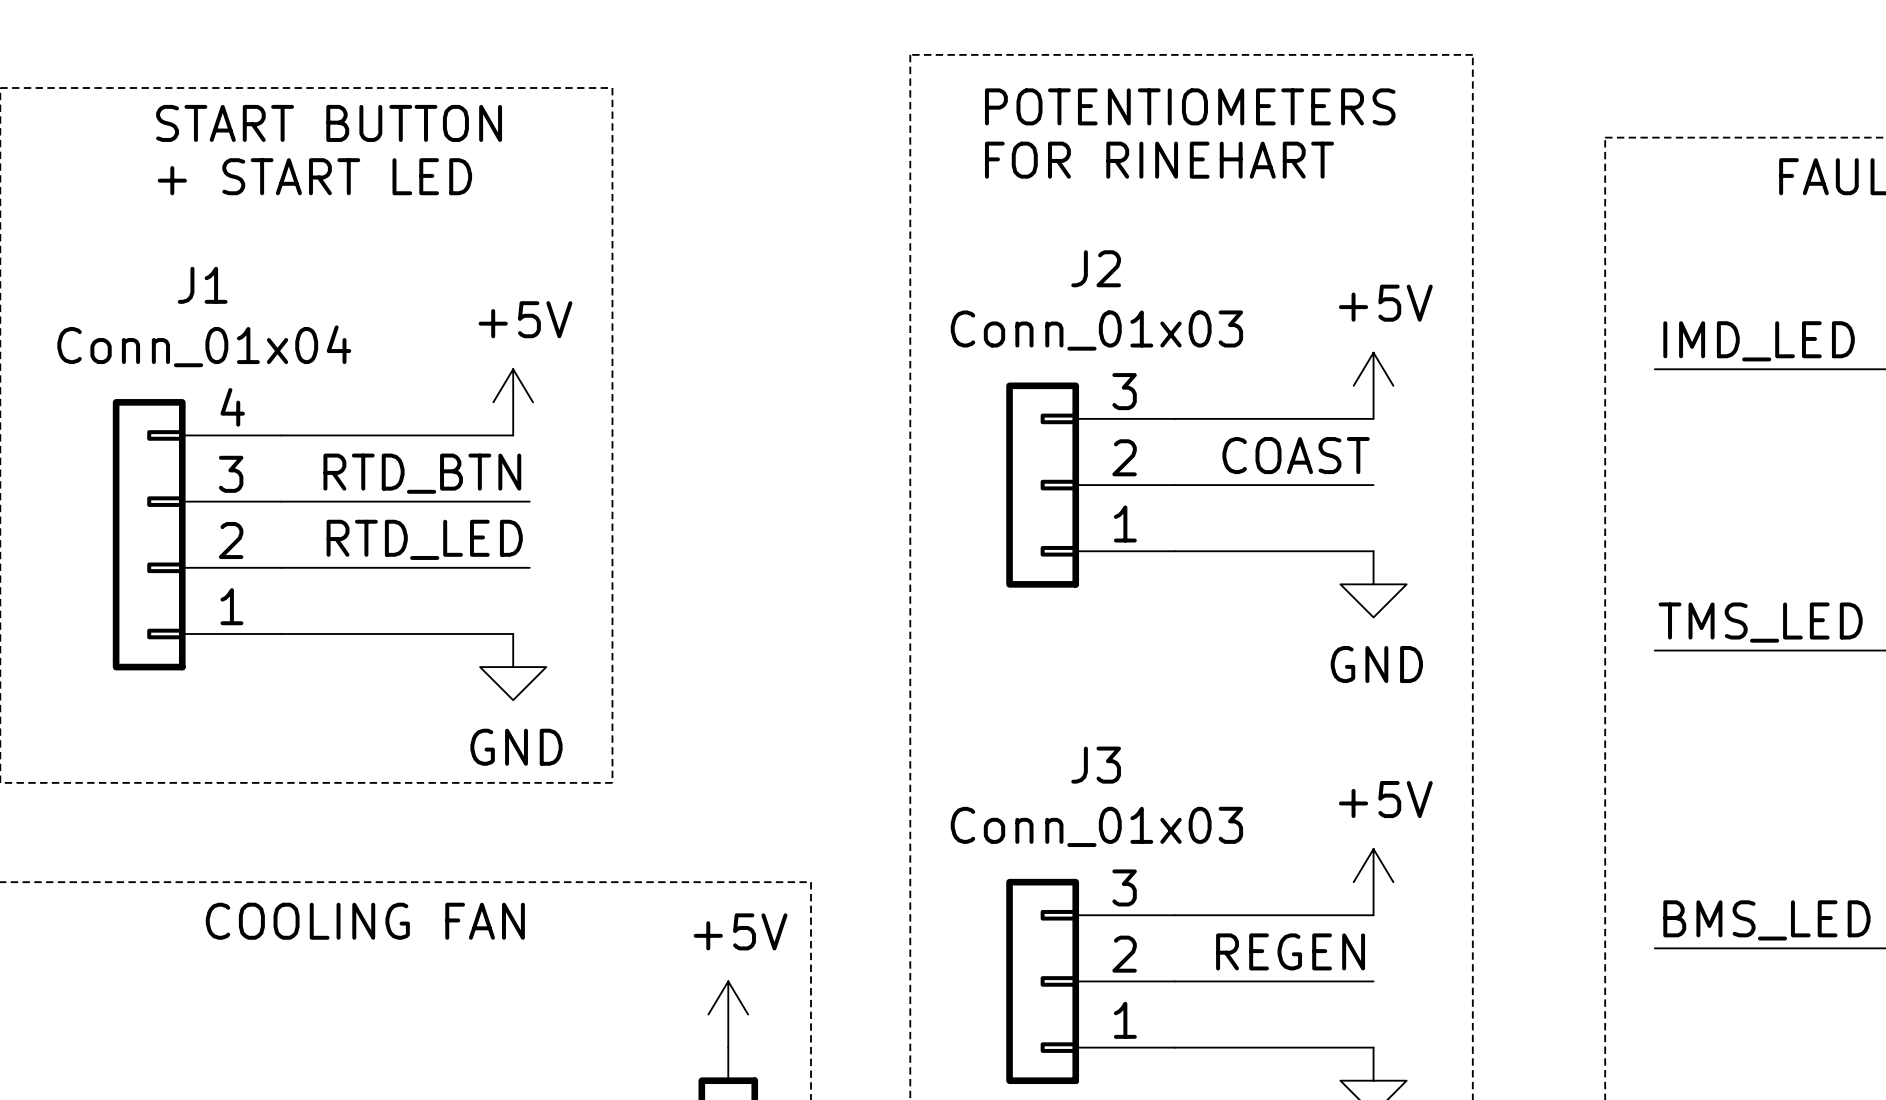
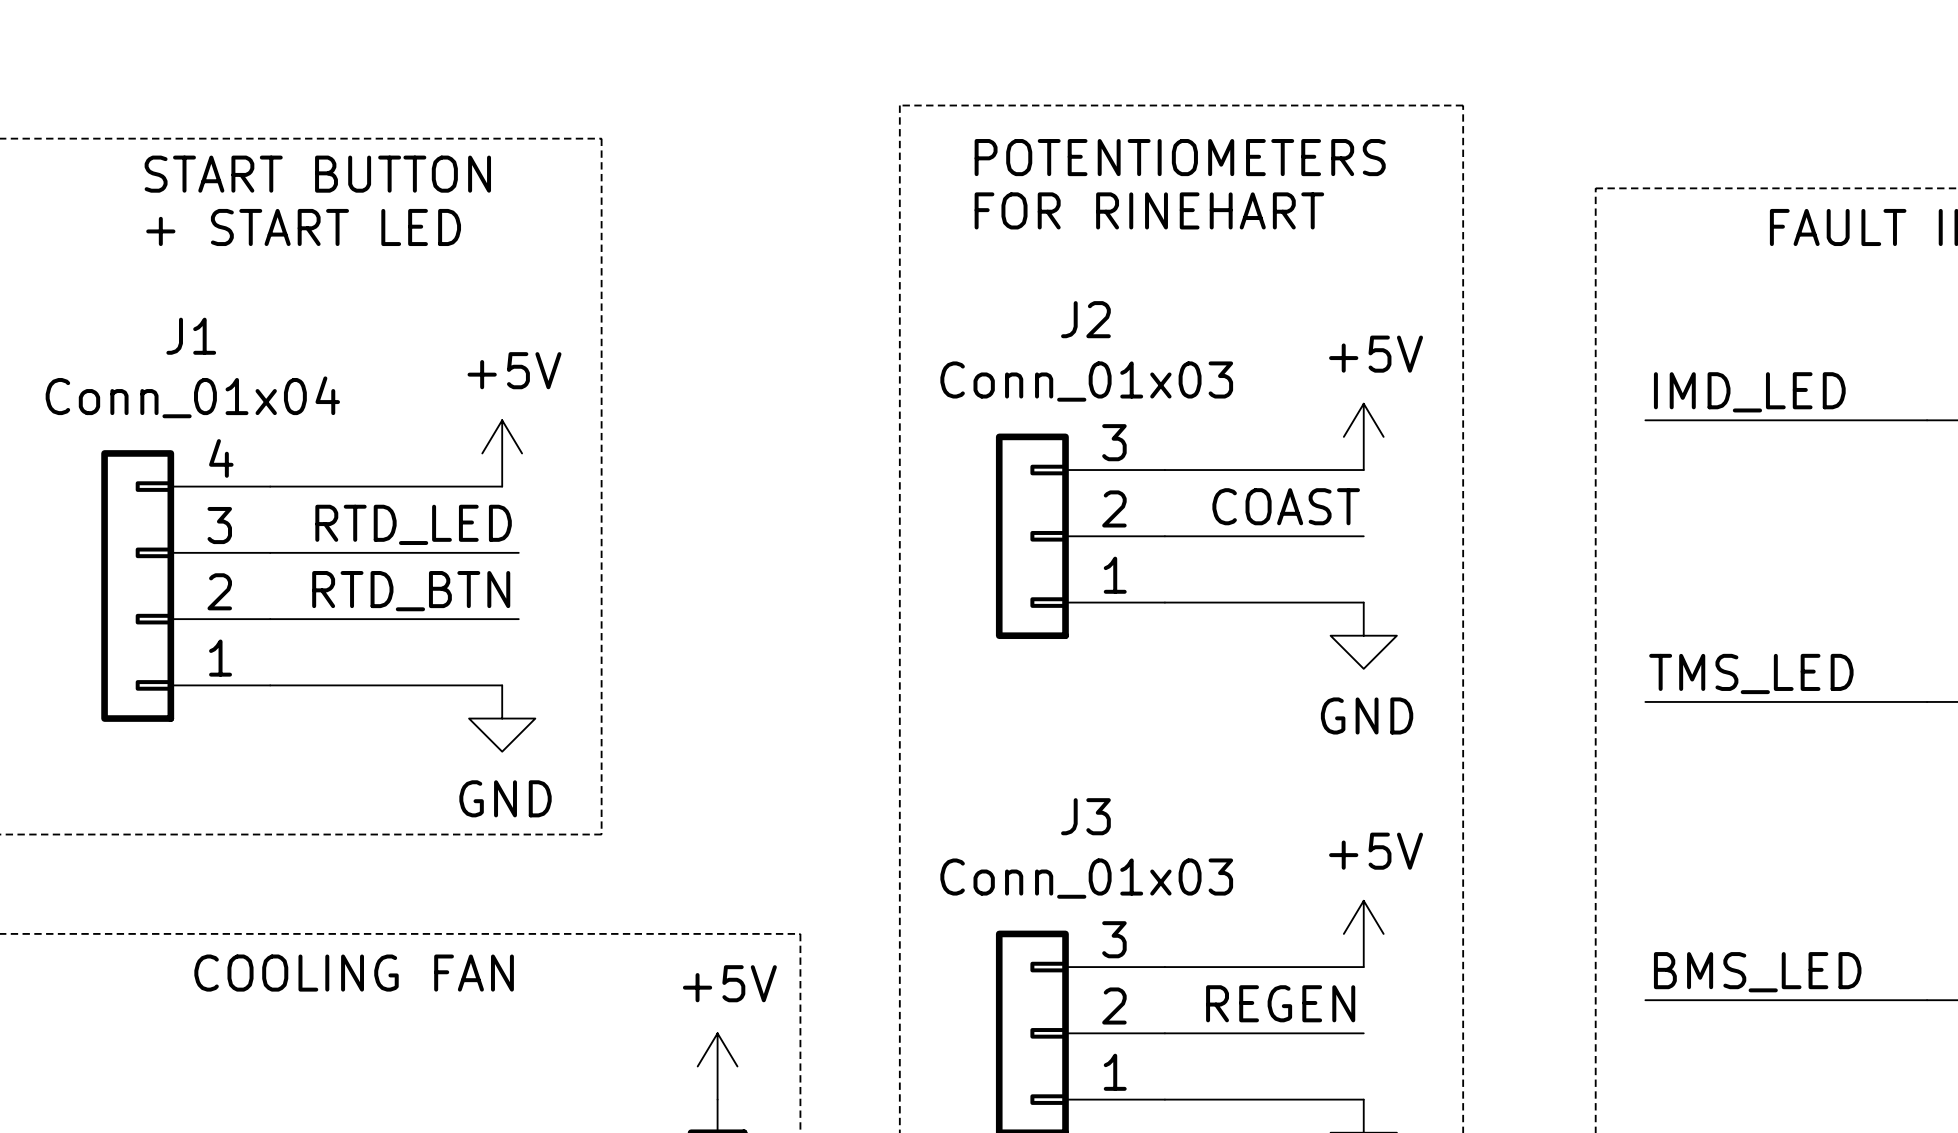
label: RTD_BTN (422, 473) -> RTD_LED (413, 524)
label: RTD_LED (424, 539) -> RTD_BTN (411, 591)

